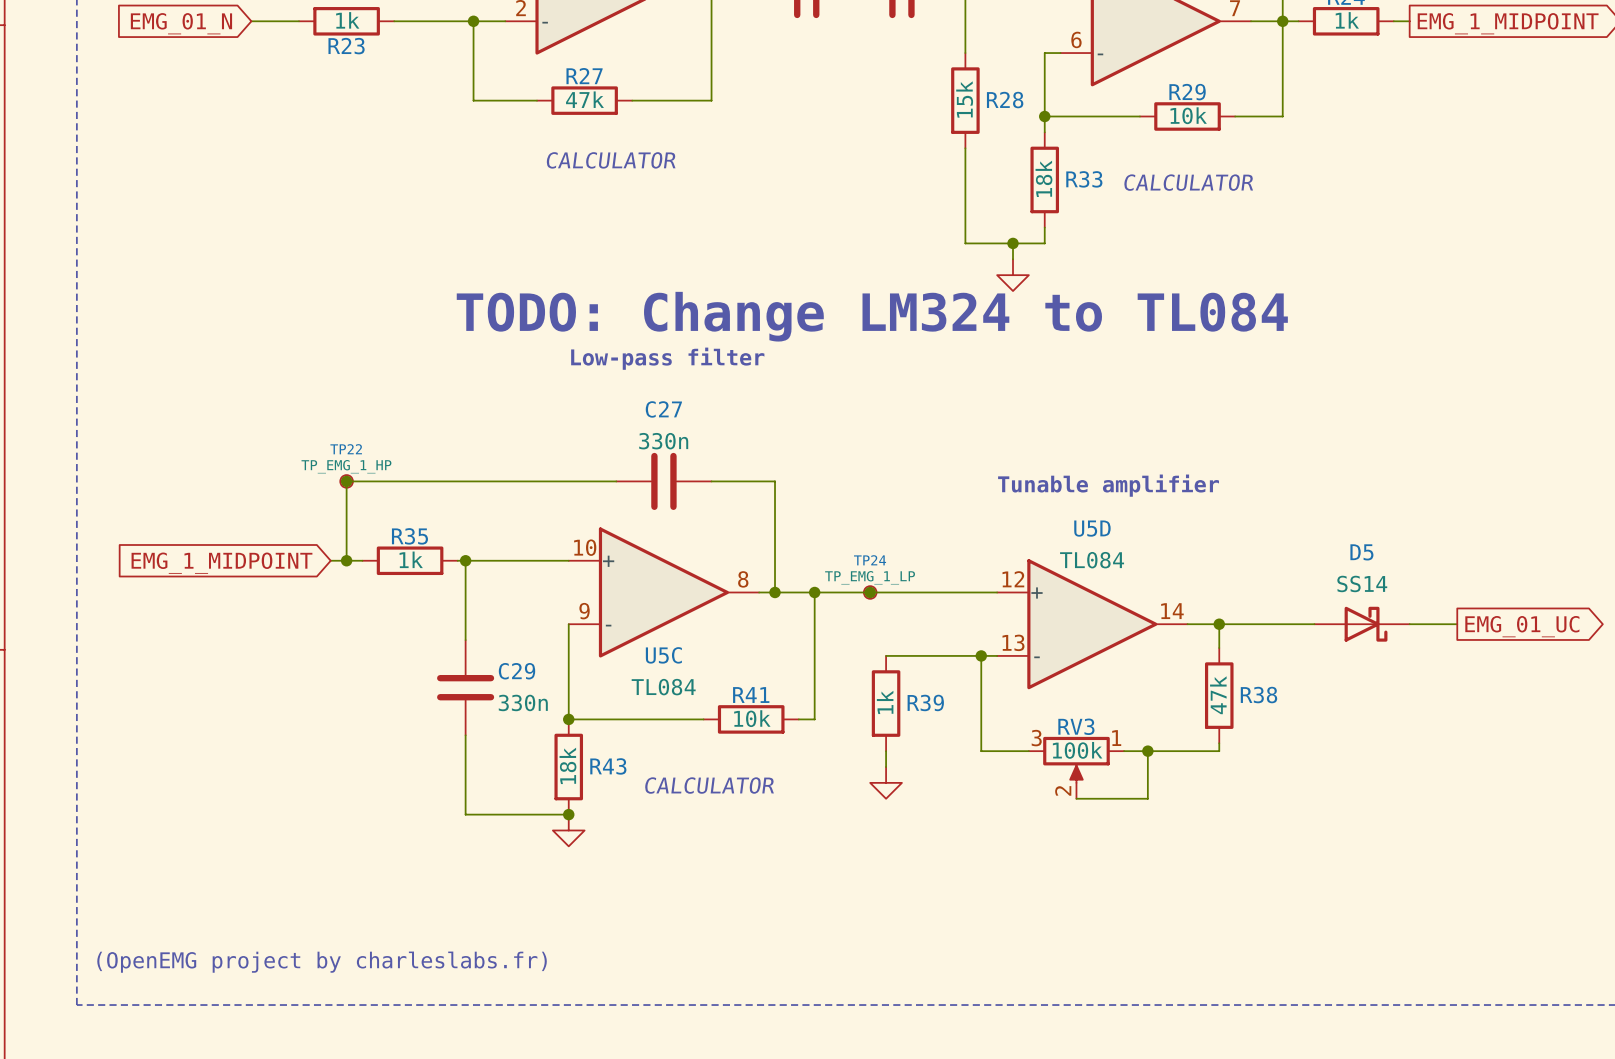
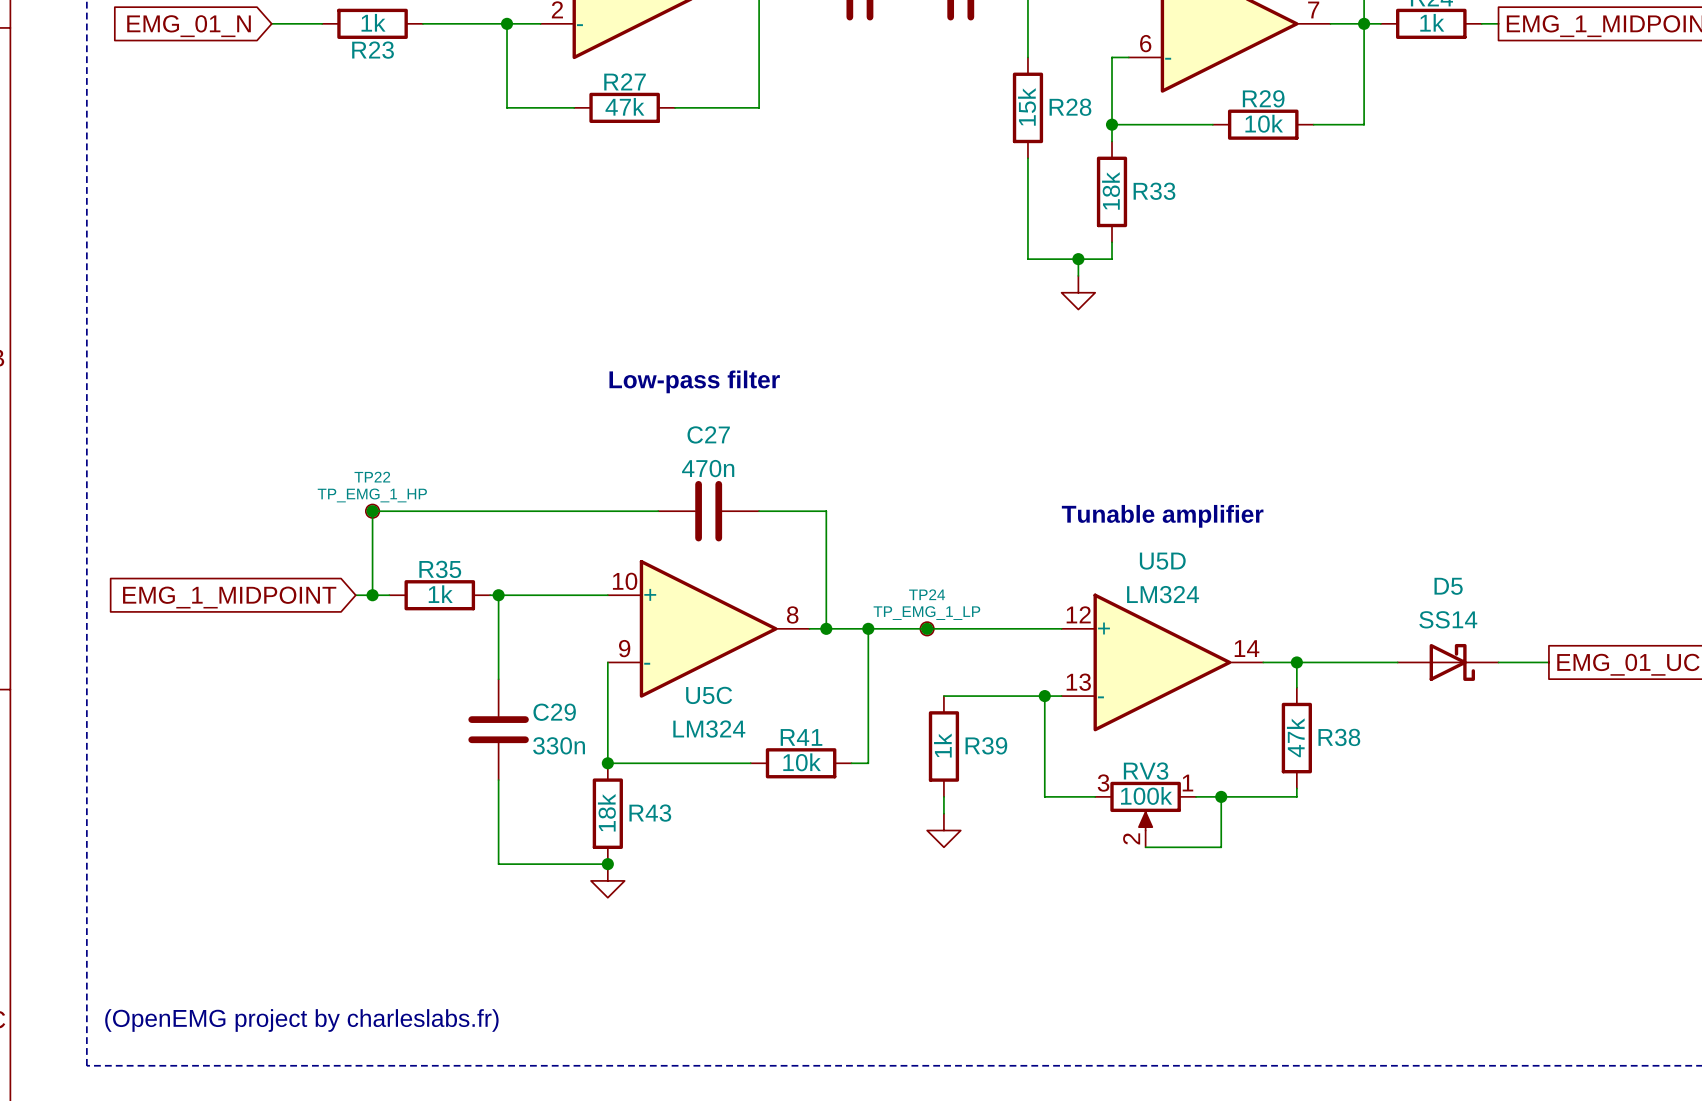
text: CALCULATOR (610, 160) -> none
text: CALCULATOR (1188, 182) -> none
text: TODO: Change LM324 to TL084 (872, 316) -> none
C27 value: 330n (663, 441) -> 470n (708, 468)
U5D value: TL084 (1092, 560) -> LM324 (1163, 594)
U5C value: TL084 (663, 687) -> LM324 (709, 729)
text: CALCULATOR (709, 785) -> none

